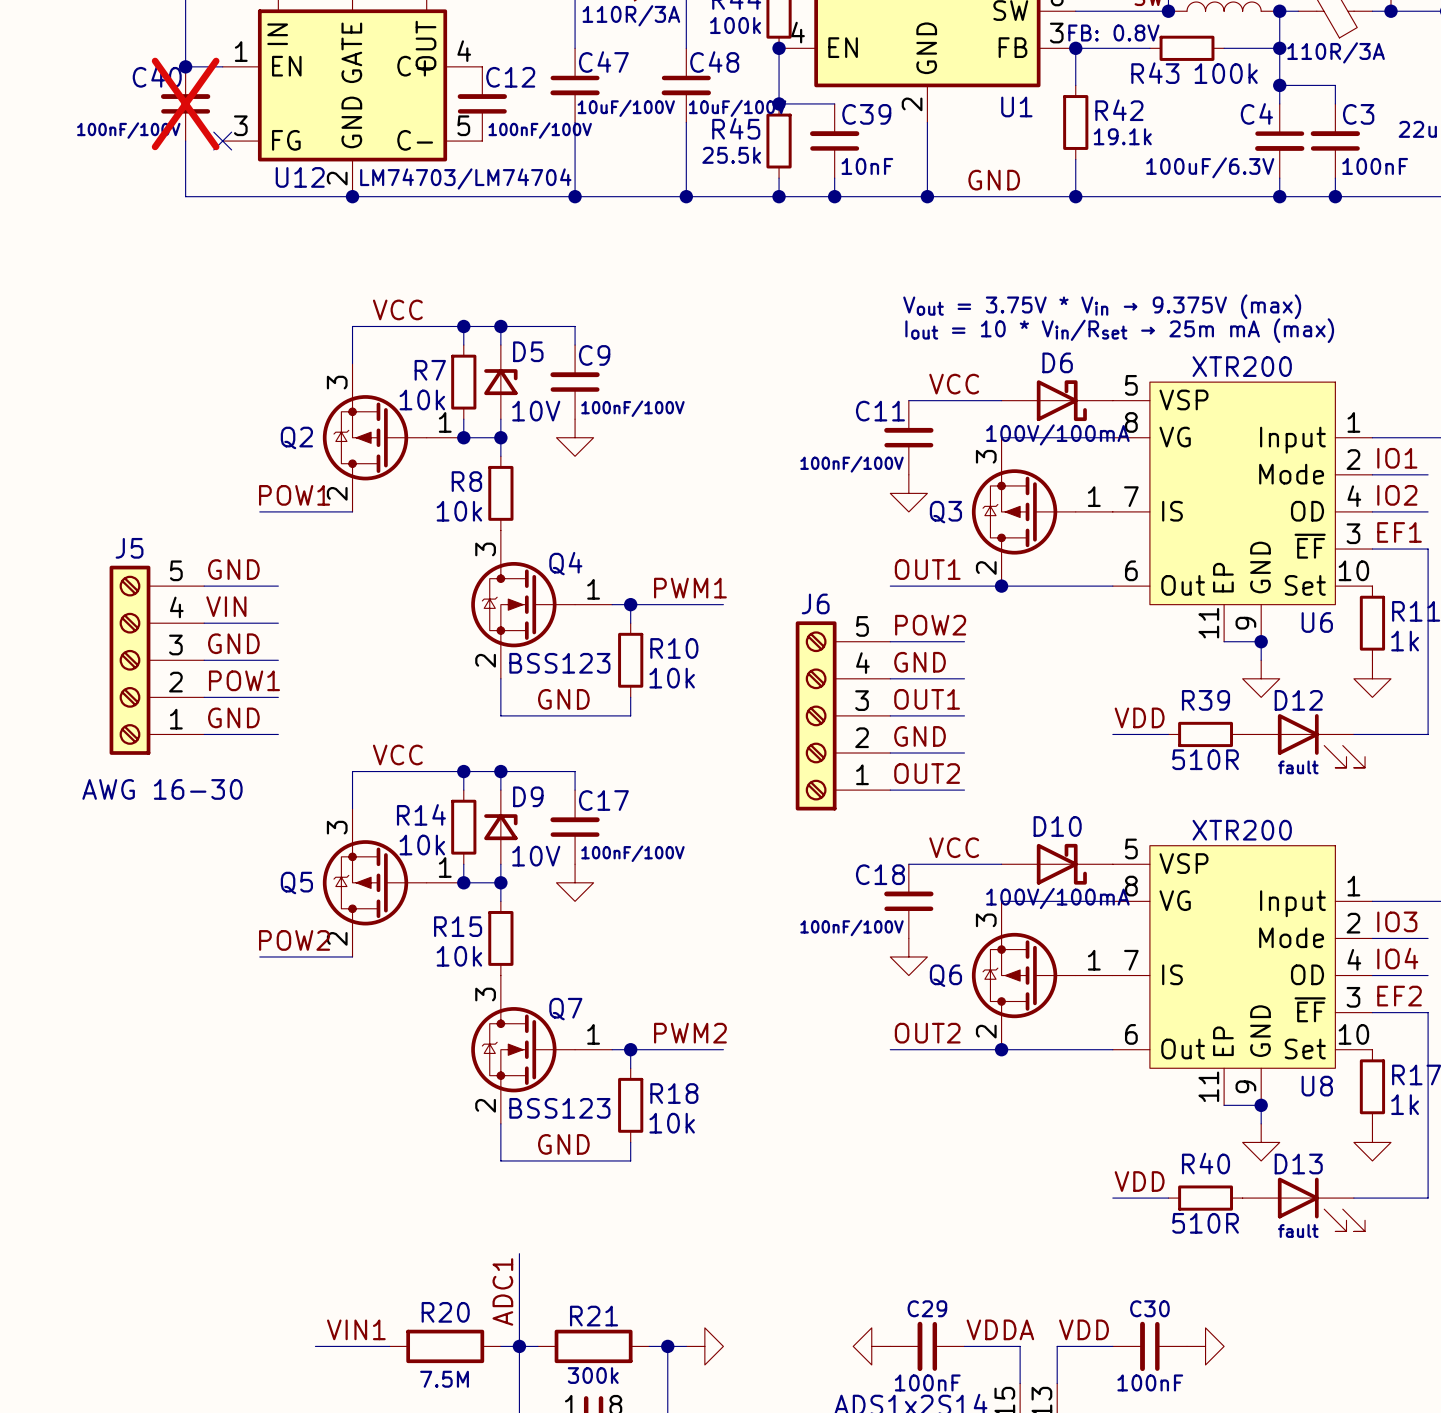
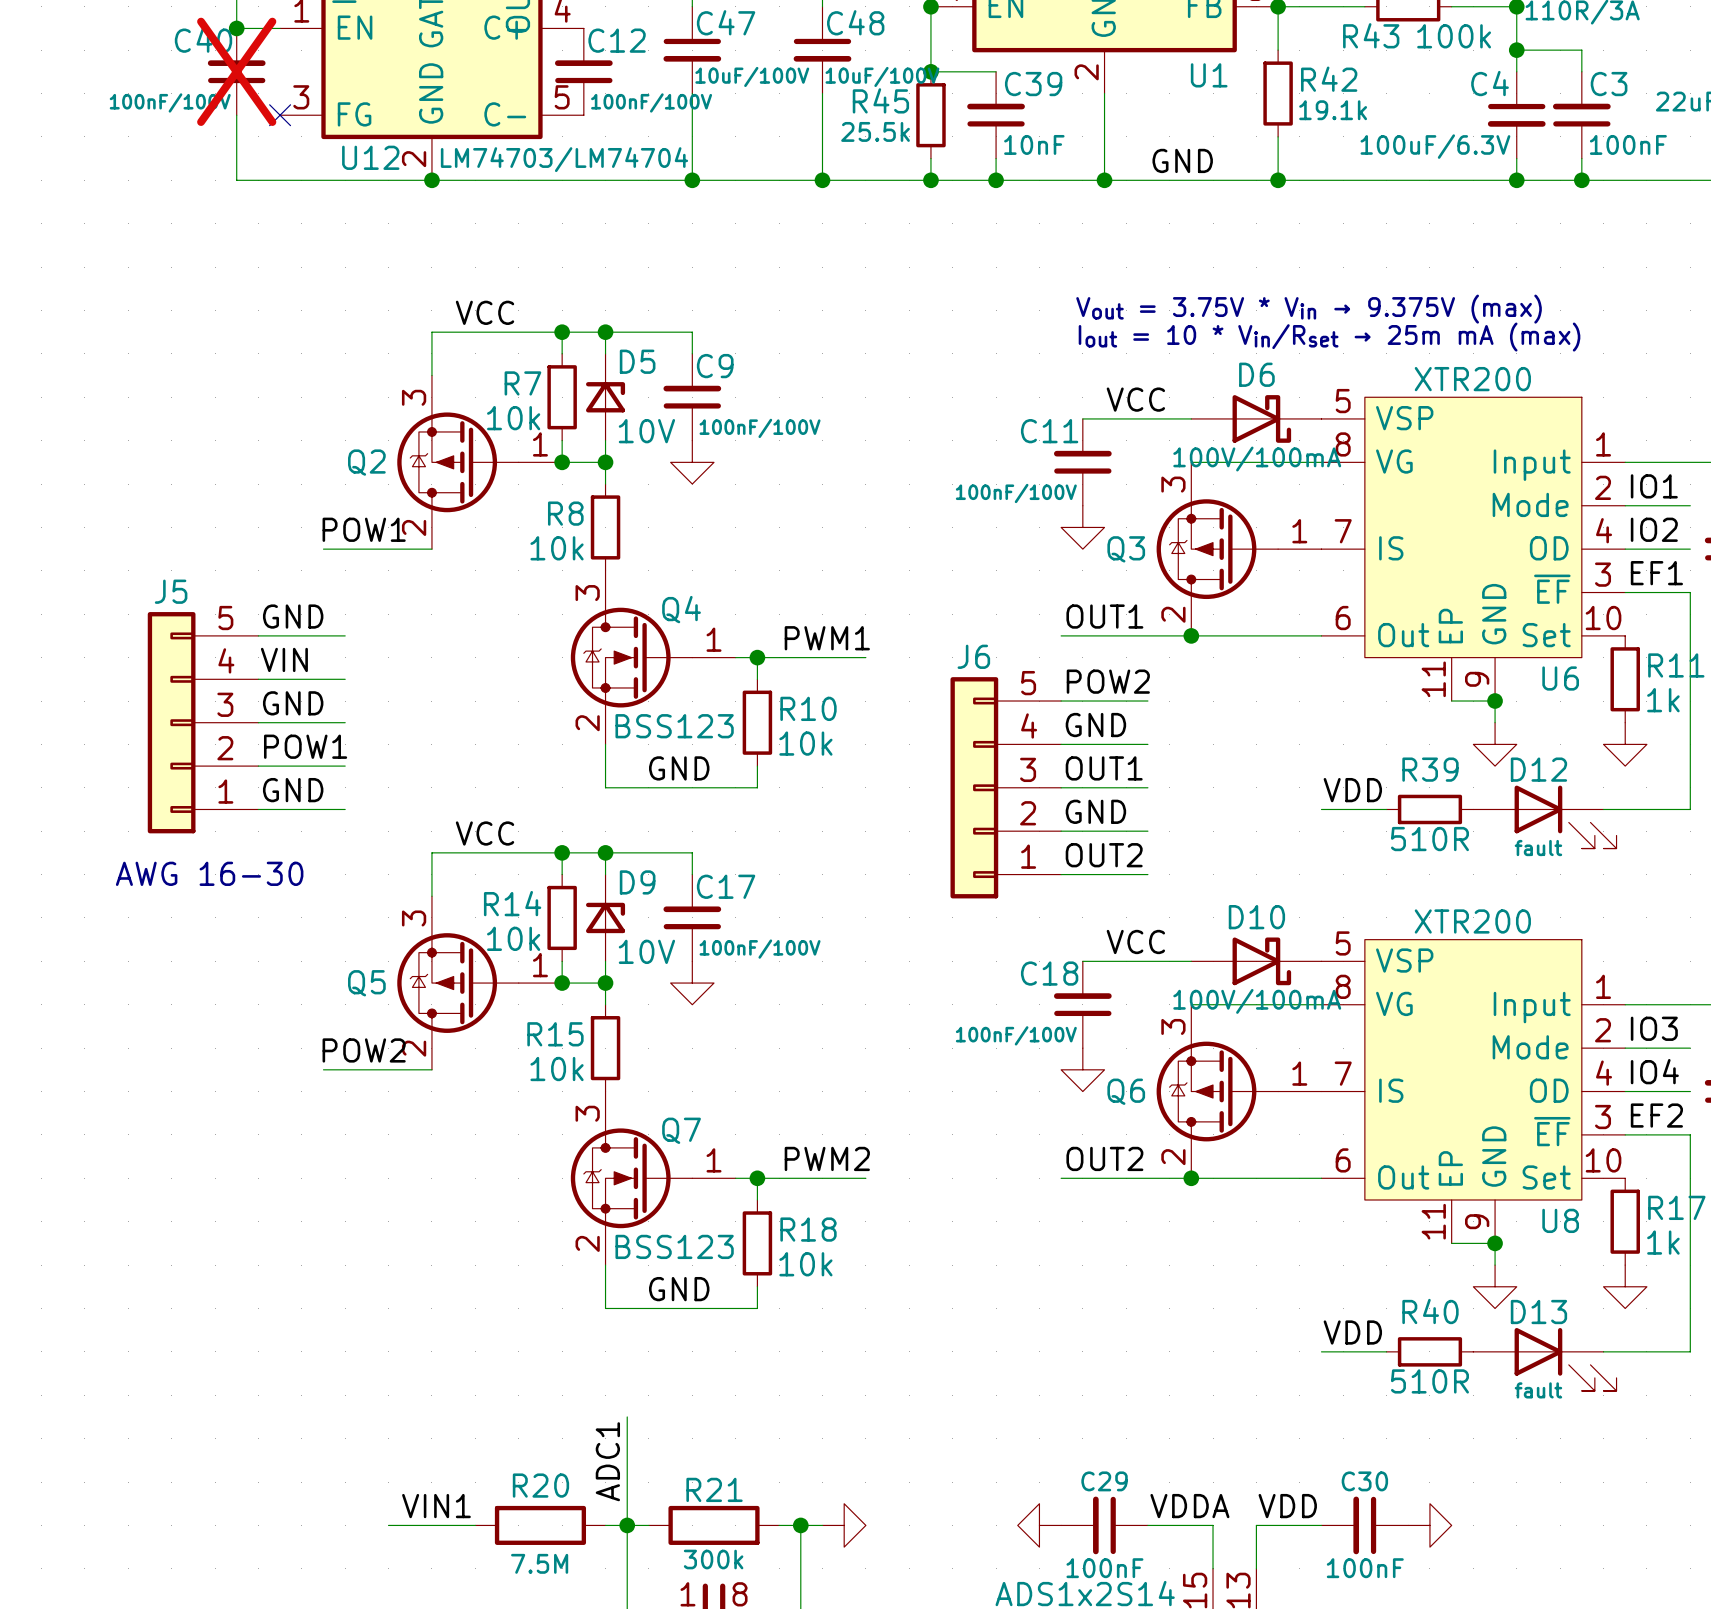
J5 symbol: [109, 565, 205, 755] -> [147, 612, 259, 834]
J6 symbol: [795, 621, 891, 811] -> [950, 677, 1062, 899]

